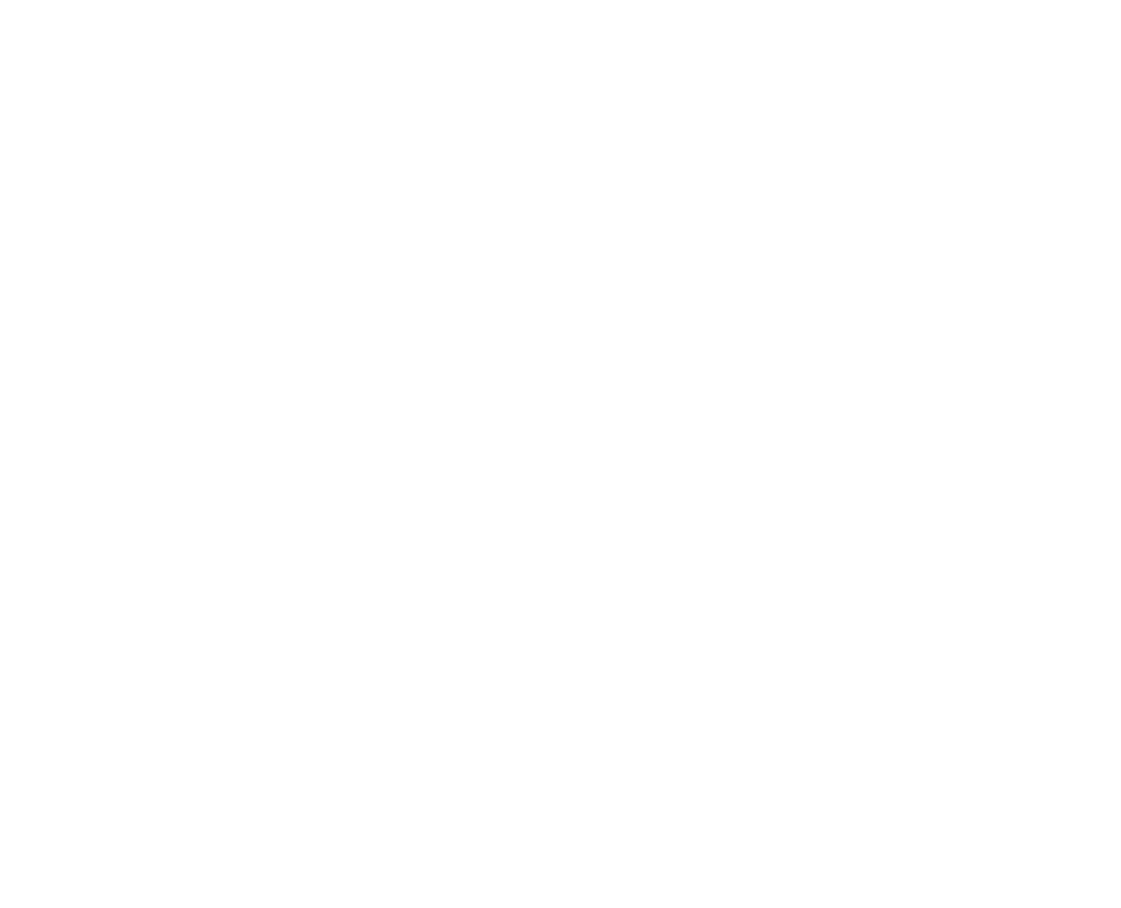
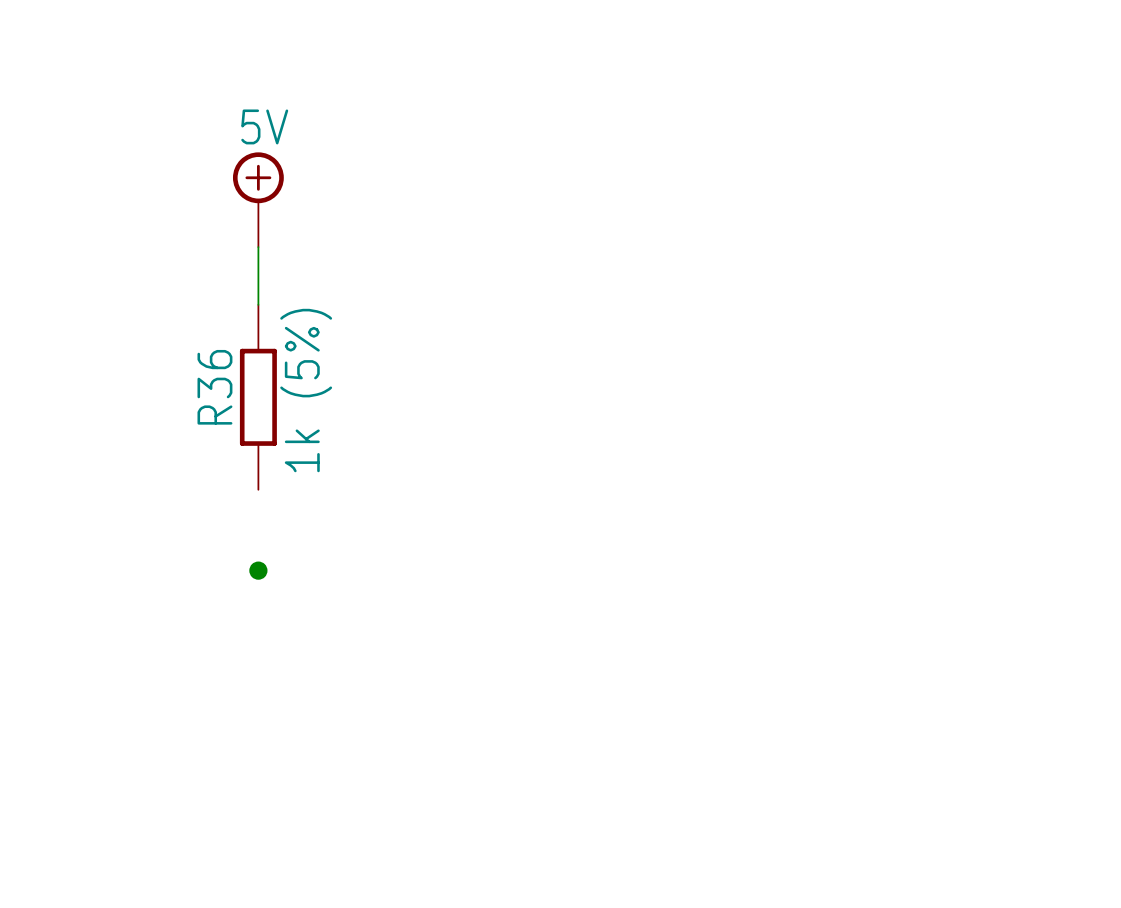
power symbol: none -> 5V (258, 199)
wire: none -> (258, 247) (258, 304)
R36: none -> 1k (5%) (258, 397)
junction: none -> (258, 570)

